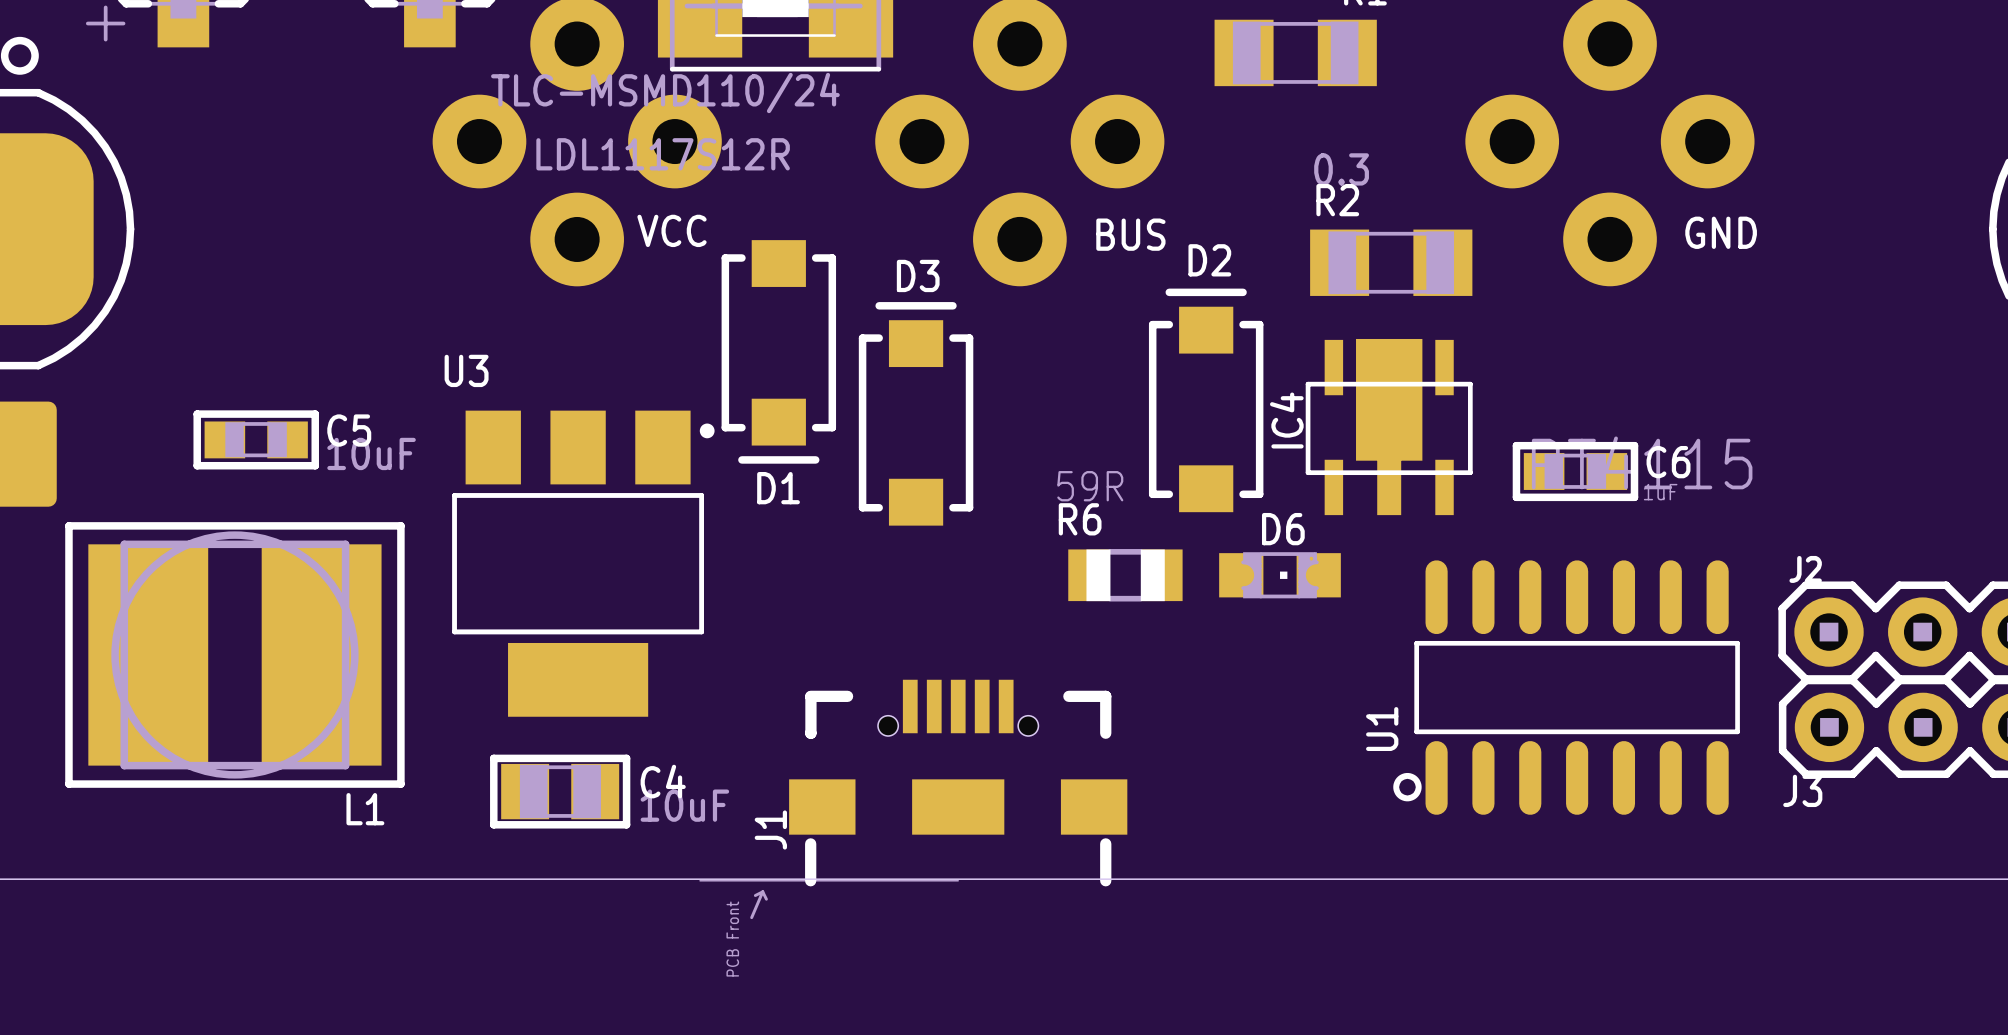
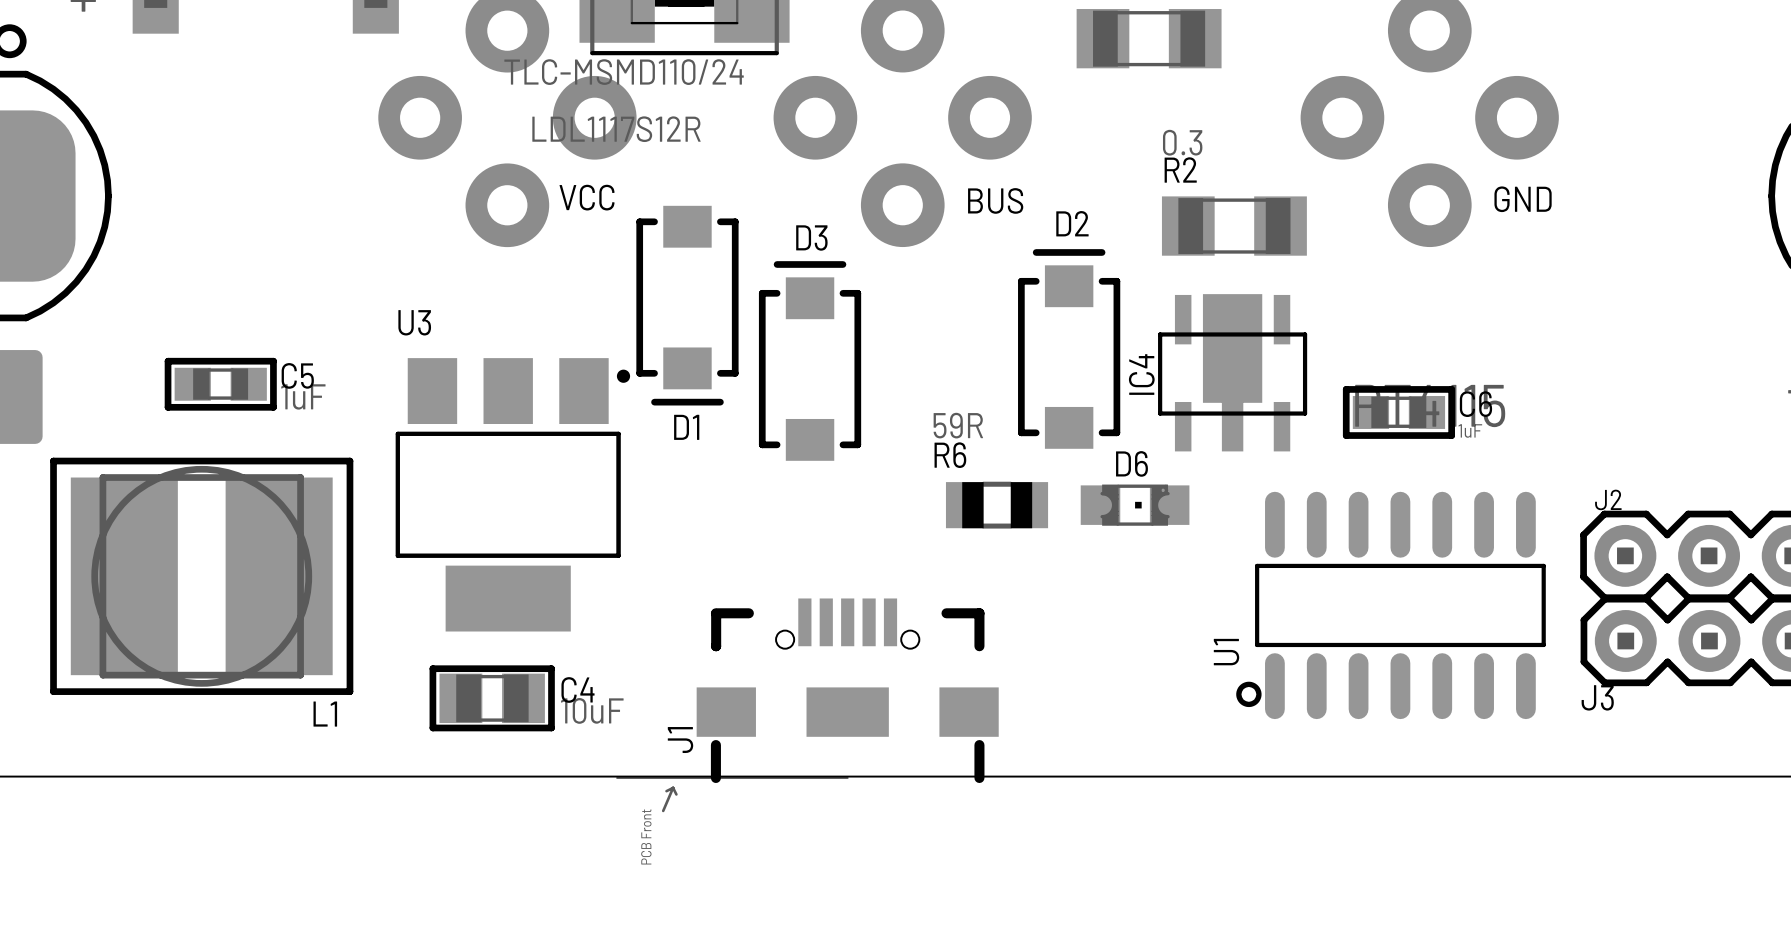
C5 value: 10uF (371, 453) -> 1uF (303, 396)

